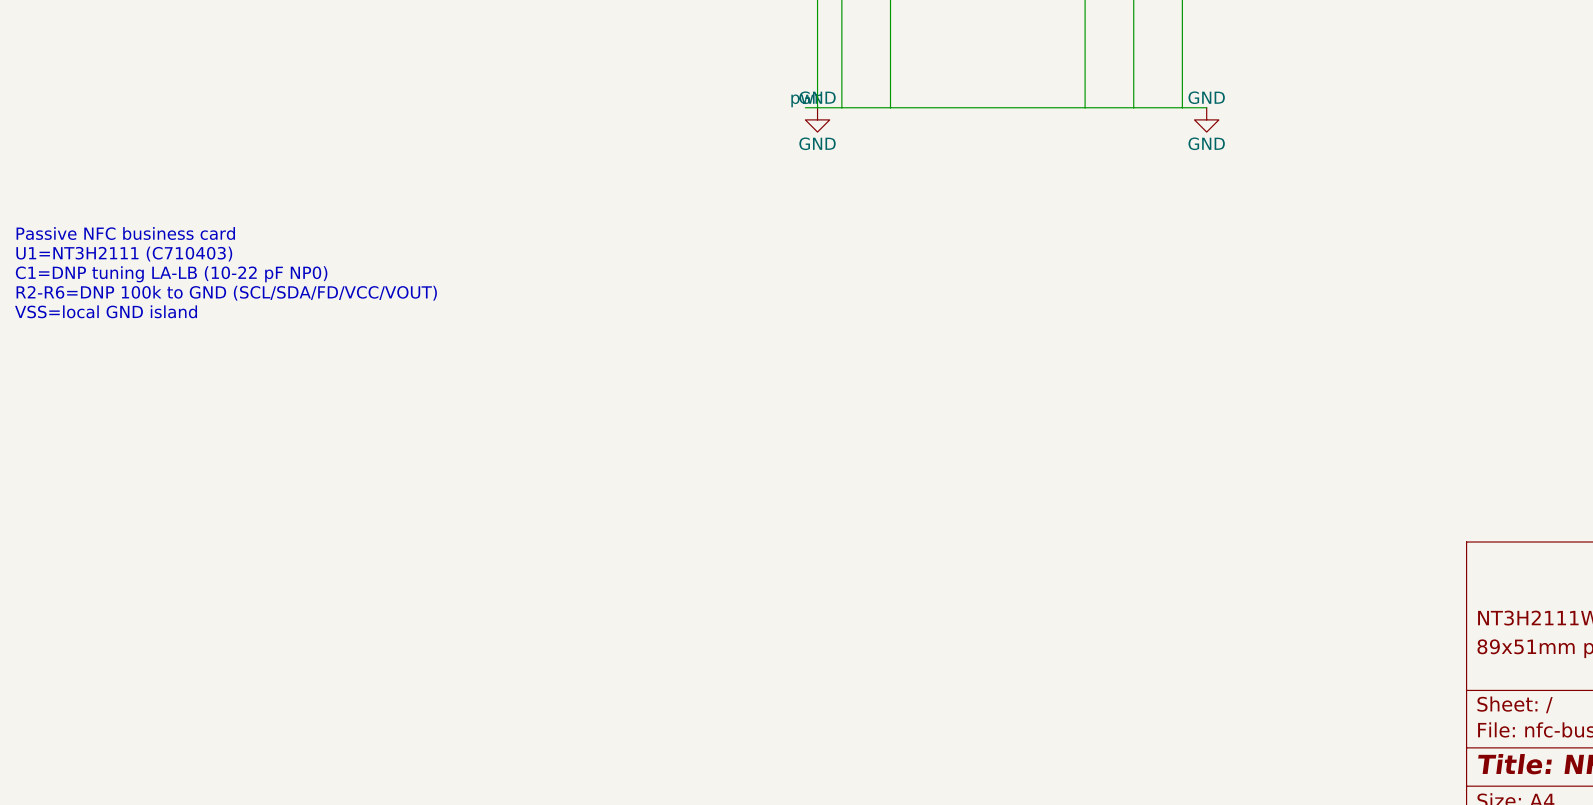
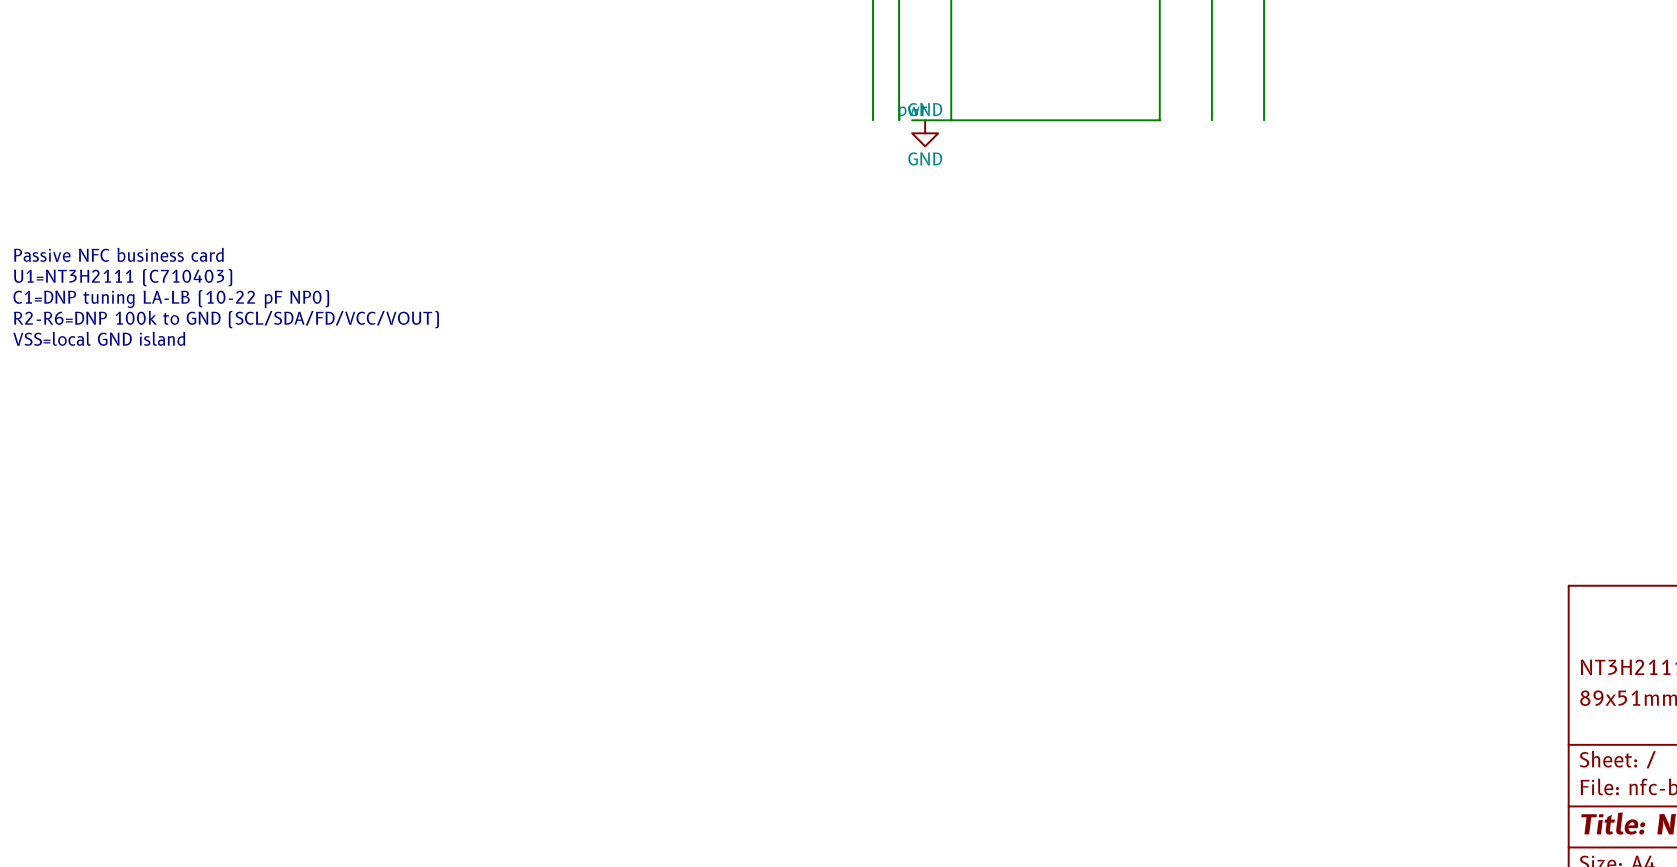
power symbol position: (806, 100) -> (912, 113)
wire: (805, 107) (854, 107) -> none
wire: (1085, 107) (1206, 107) -> none
power symbol position: GND (817, 119) -> GND (925, 133)
power symbol: GND (1206, 119) -> none

